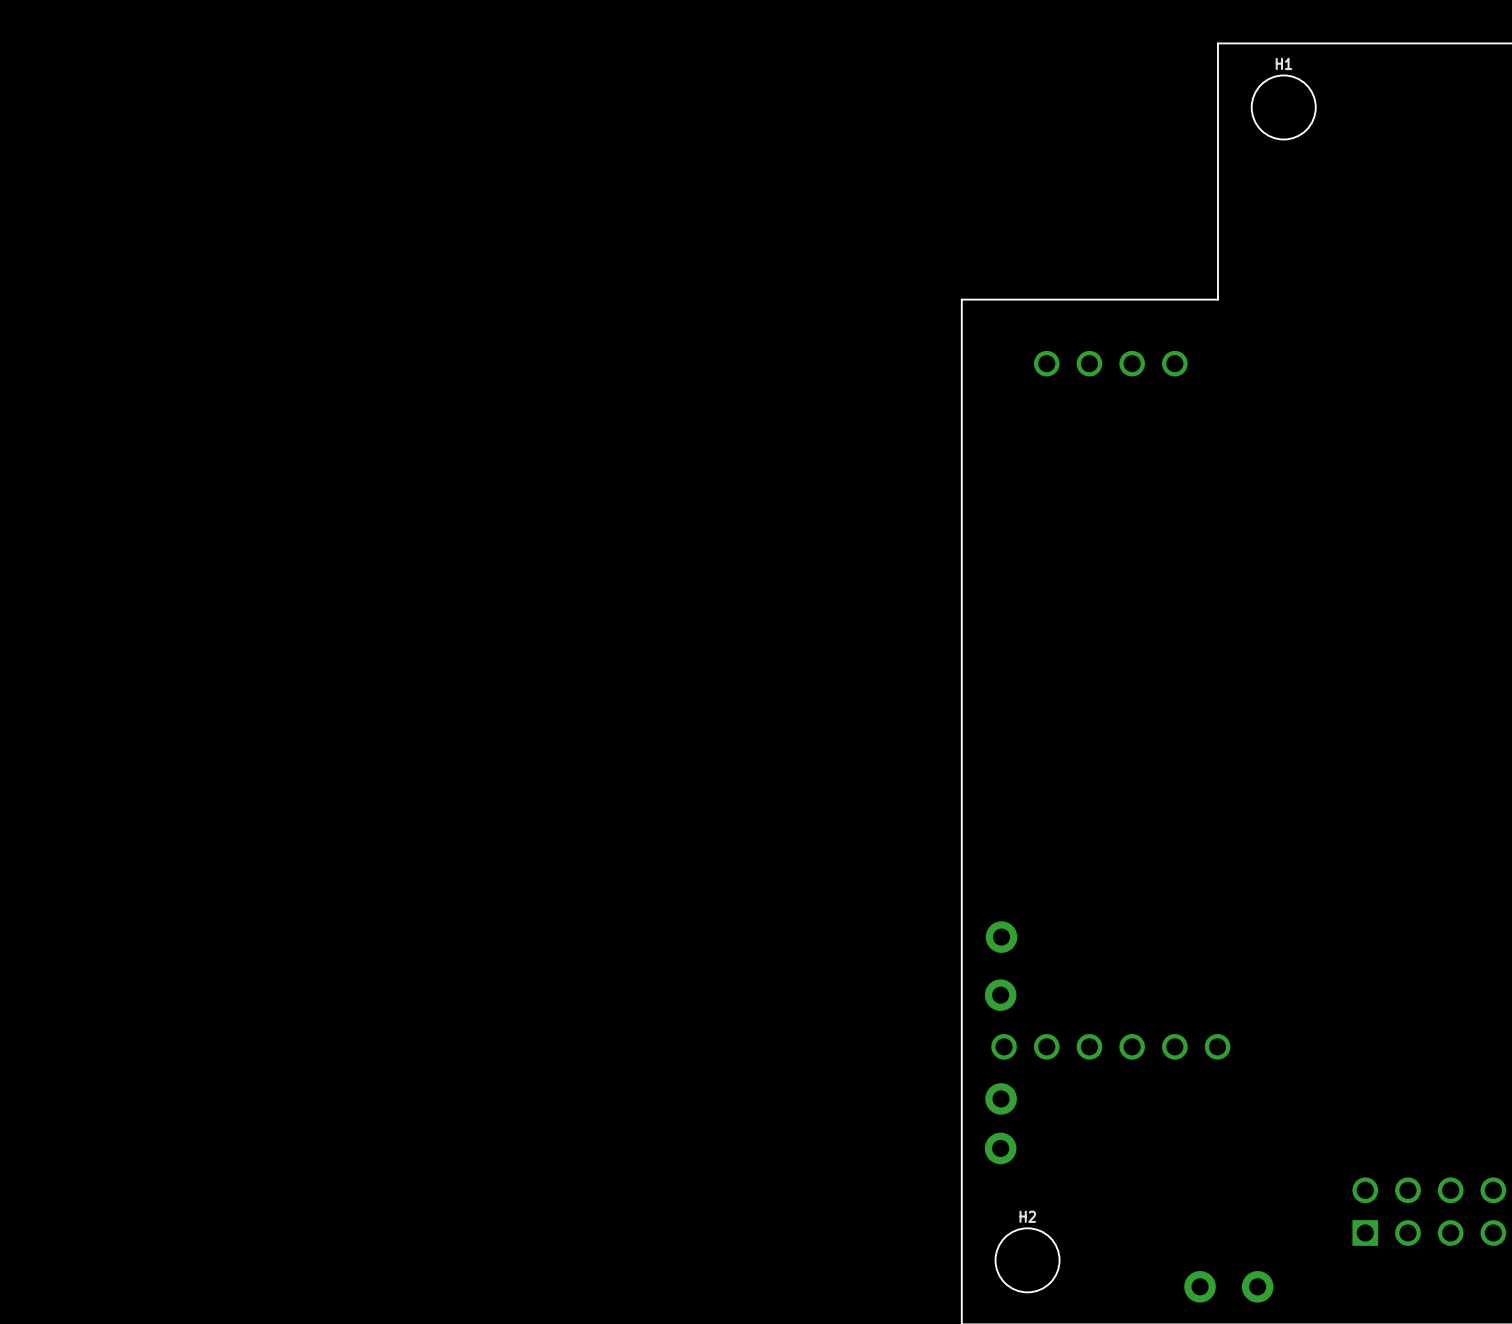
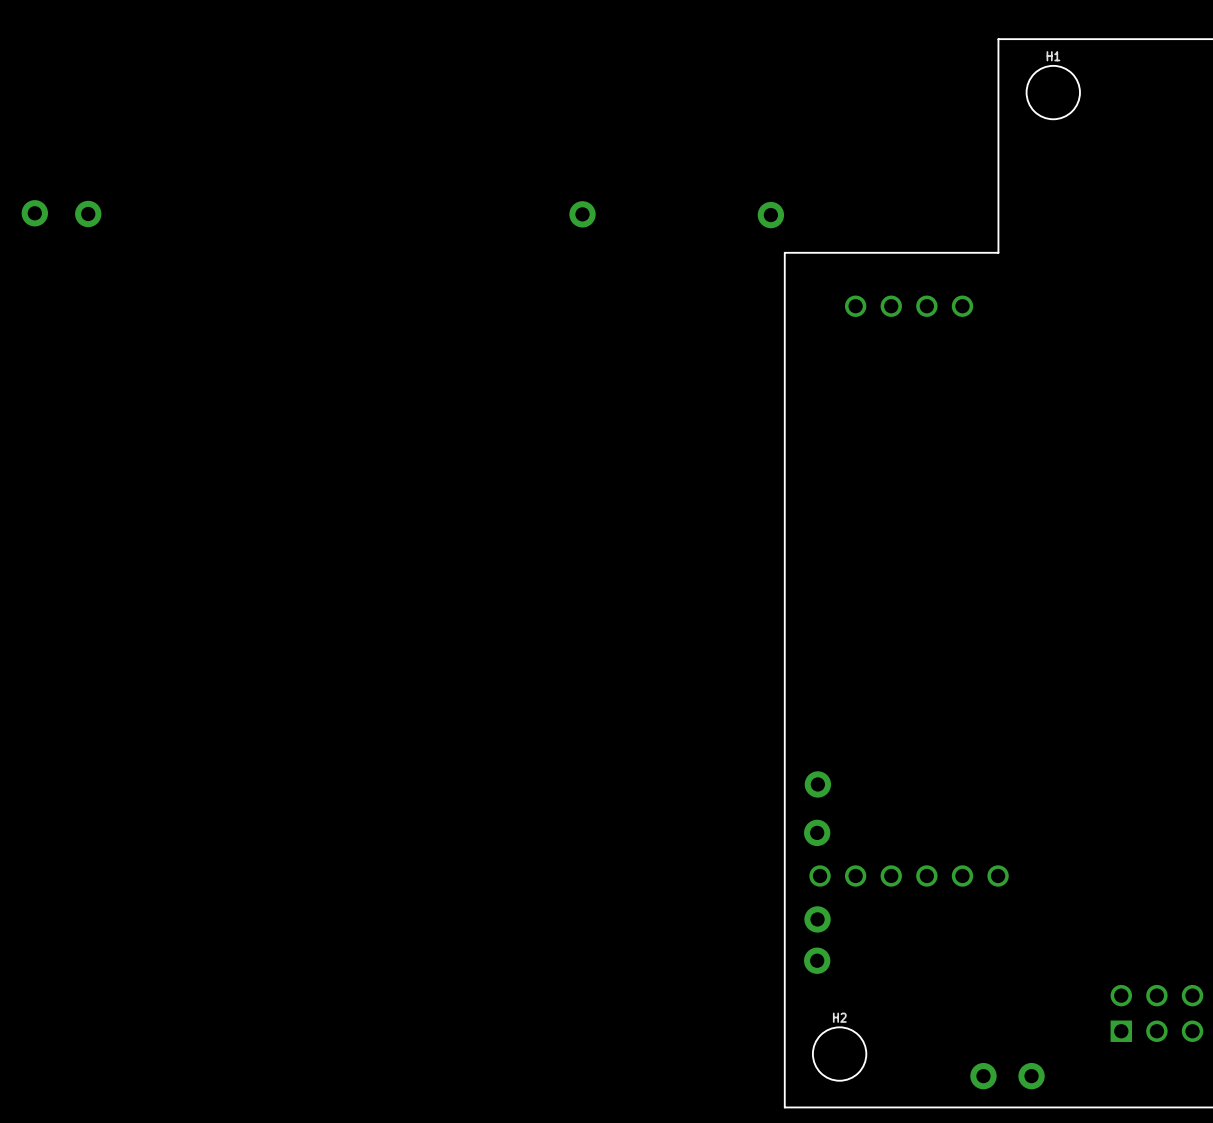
part: none -> (34, 213)
part: none -> (88, 213)
part: none -> (582, 214)
part: none -> (770, 215)

